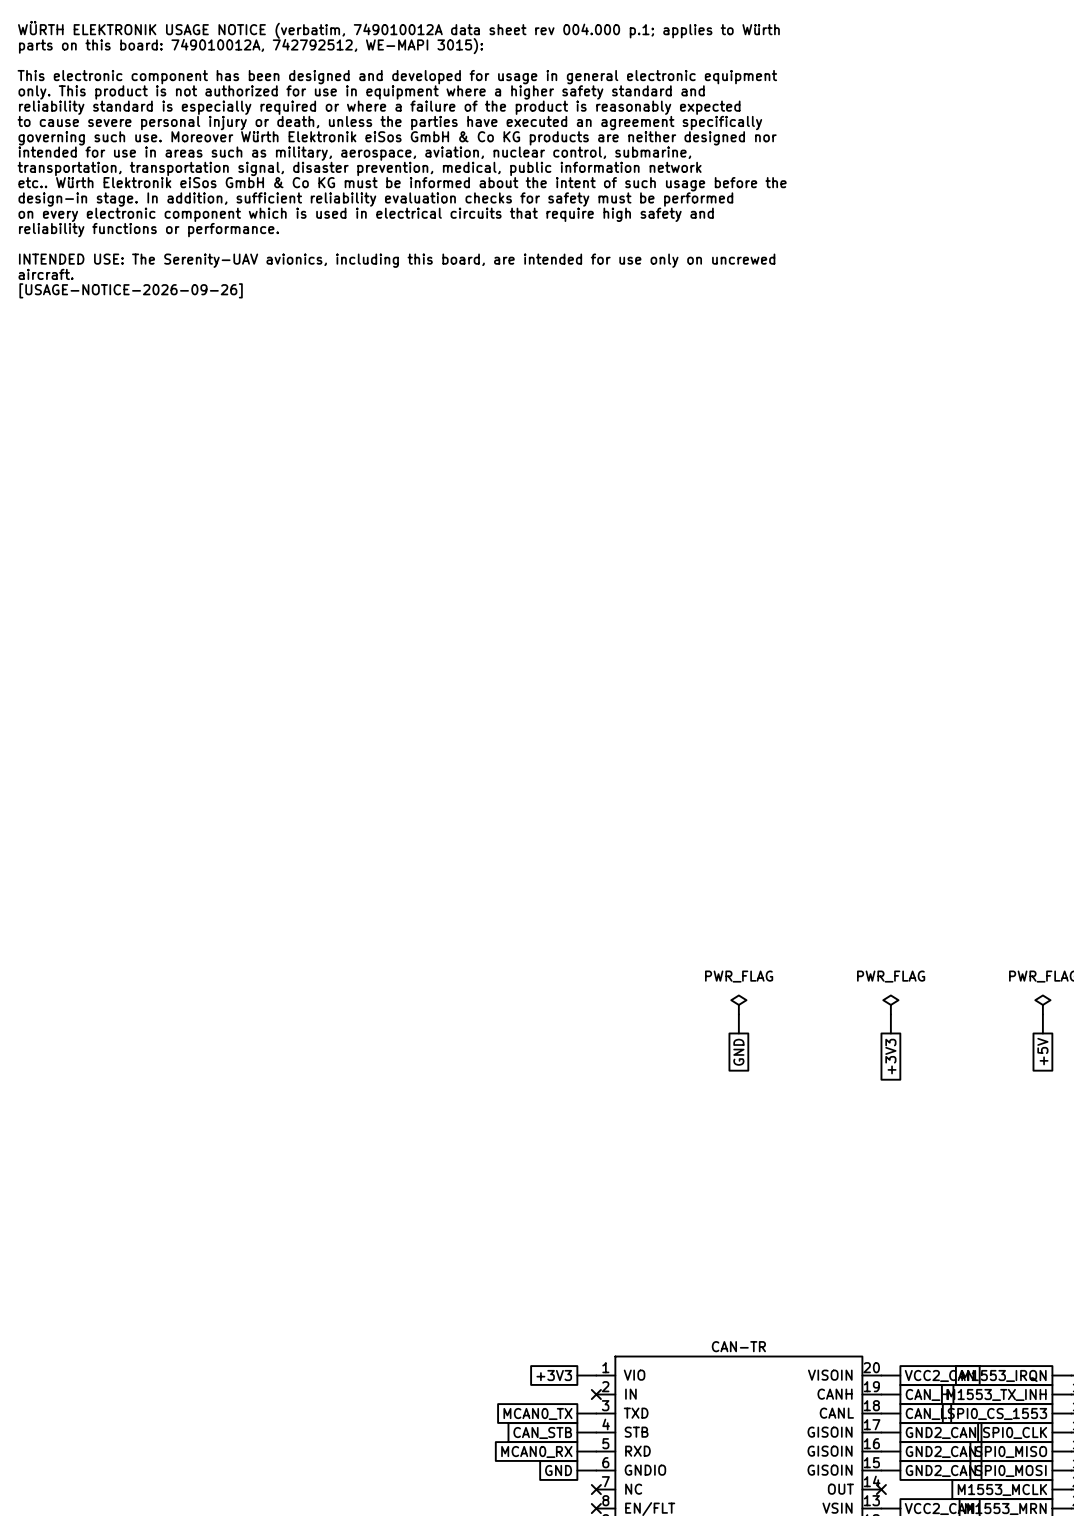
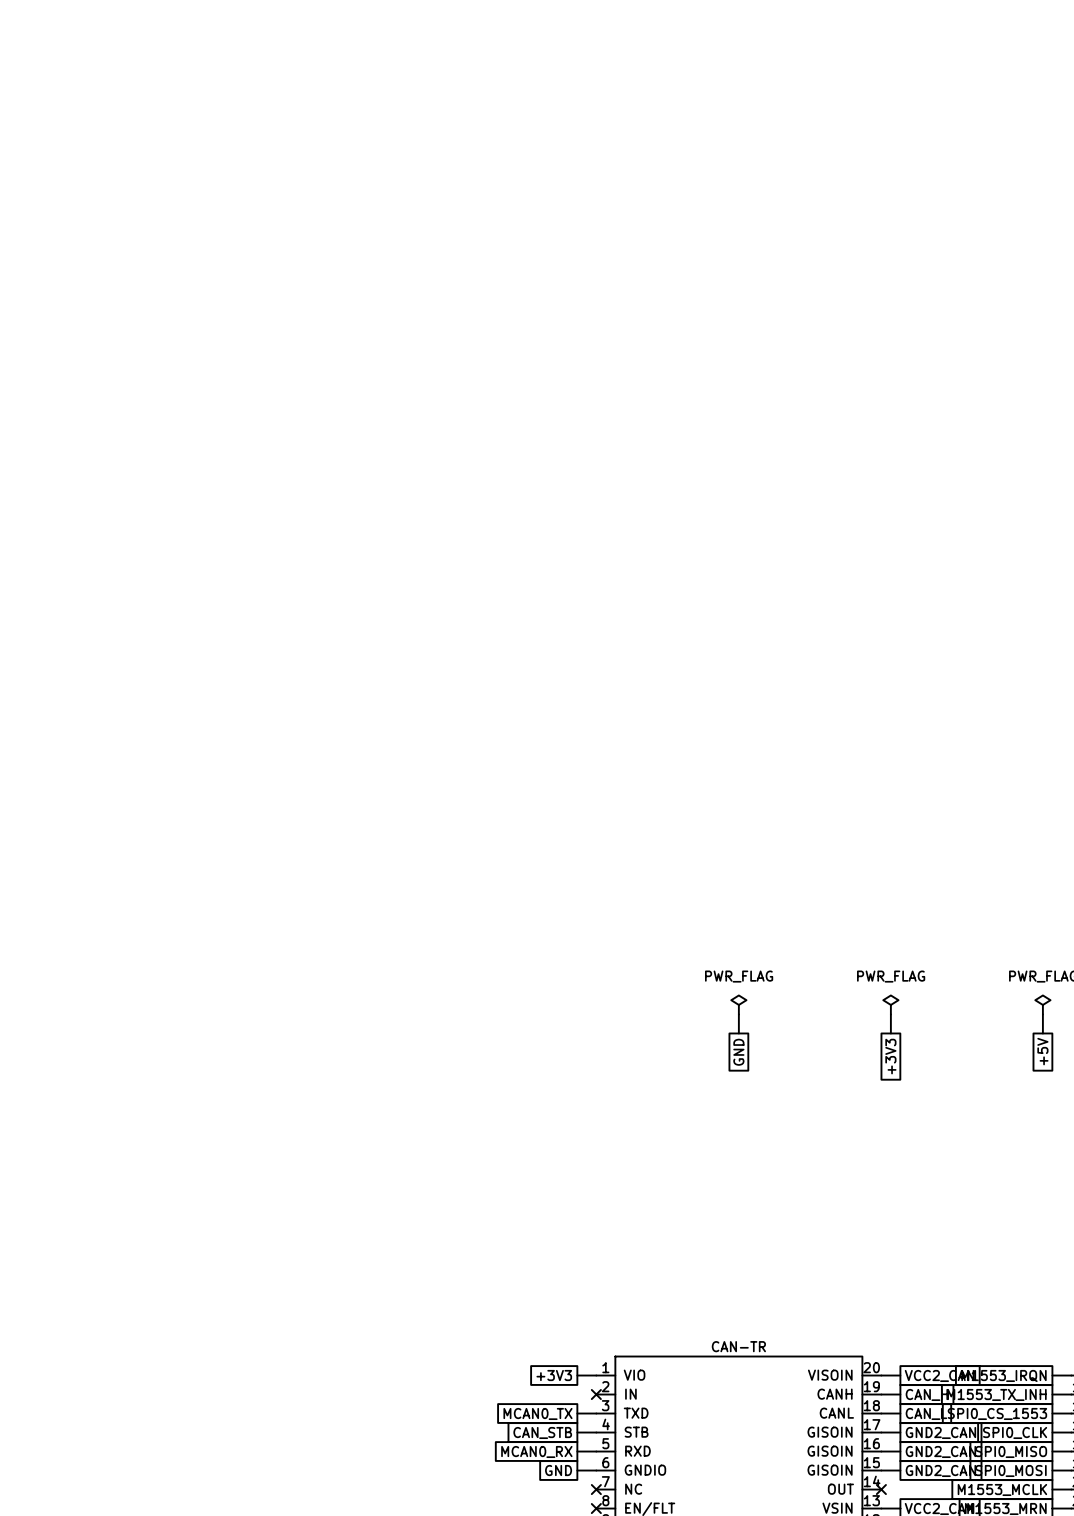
text: WÜRTH ELEKTRONIK USAGE NOTICE (verbatim, 749010012A data sheet rev 004.000 p.1; applies to Würth (398, 29) -> none
text: parts on this board: 749010012A, 742792512, WE-MAPI 3015): (250, 46) -> none
text: This electronic component has been designed and developed for usage in general electronic equipment (397, 77) -> none
text: only. This product is not authorized for use in equipment where a higher safety standard and (361, 92) -> none
text: reliability standard is especially required or where a failure of the product is reasonably expected (379, 107) -> none
text: to cause severe personal injury or death, unless the parties have executed an agreement specifically (389, 123) -> none
text: governing such use. Moreover Würth Elektronik eiSos GmbH & Co KG products are neither designed nor (397, 138) -> none
text: intended for use in areas such as military, aerospace, aviation, nuclear control, submarine, (354, 153) -> none
text: transportation, transportation signal, disaster prevention, medical, public information network (359, 168) -> none
text: etc.. Würth Elektronik eiSos GmbH & Co KG must be informed about the intent of such usage before the (402, 184) -> none
text: design-in stage. In addition, sufficient reliability evaluation checks for safety must be performed (375, 199) -> none
text: on every electronic component which is used in electrical circuits that require high safety and (366, 214) -> none
text: reliability functions or performance. (148, 230) -> none
text: INTENDED USE: The Serenity-UAV avionics, including this board, are intended for use only on uncrewed (397, 260) -> none
text: aircraft. (46, 274) -> none
text: [USAGE-NOTICE-2026-09-26] (131, 290) -> none

